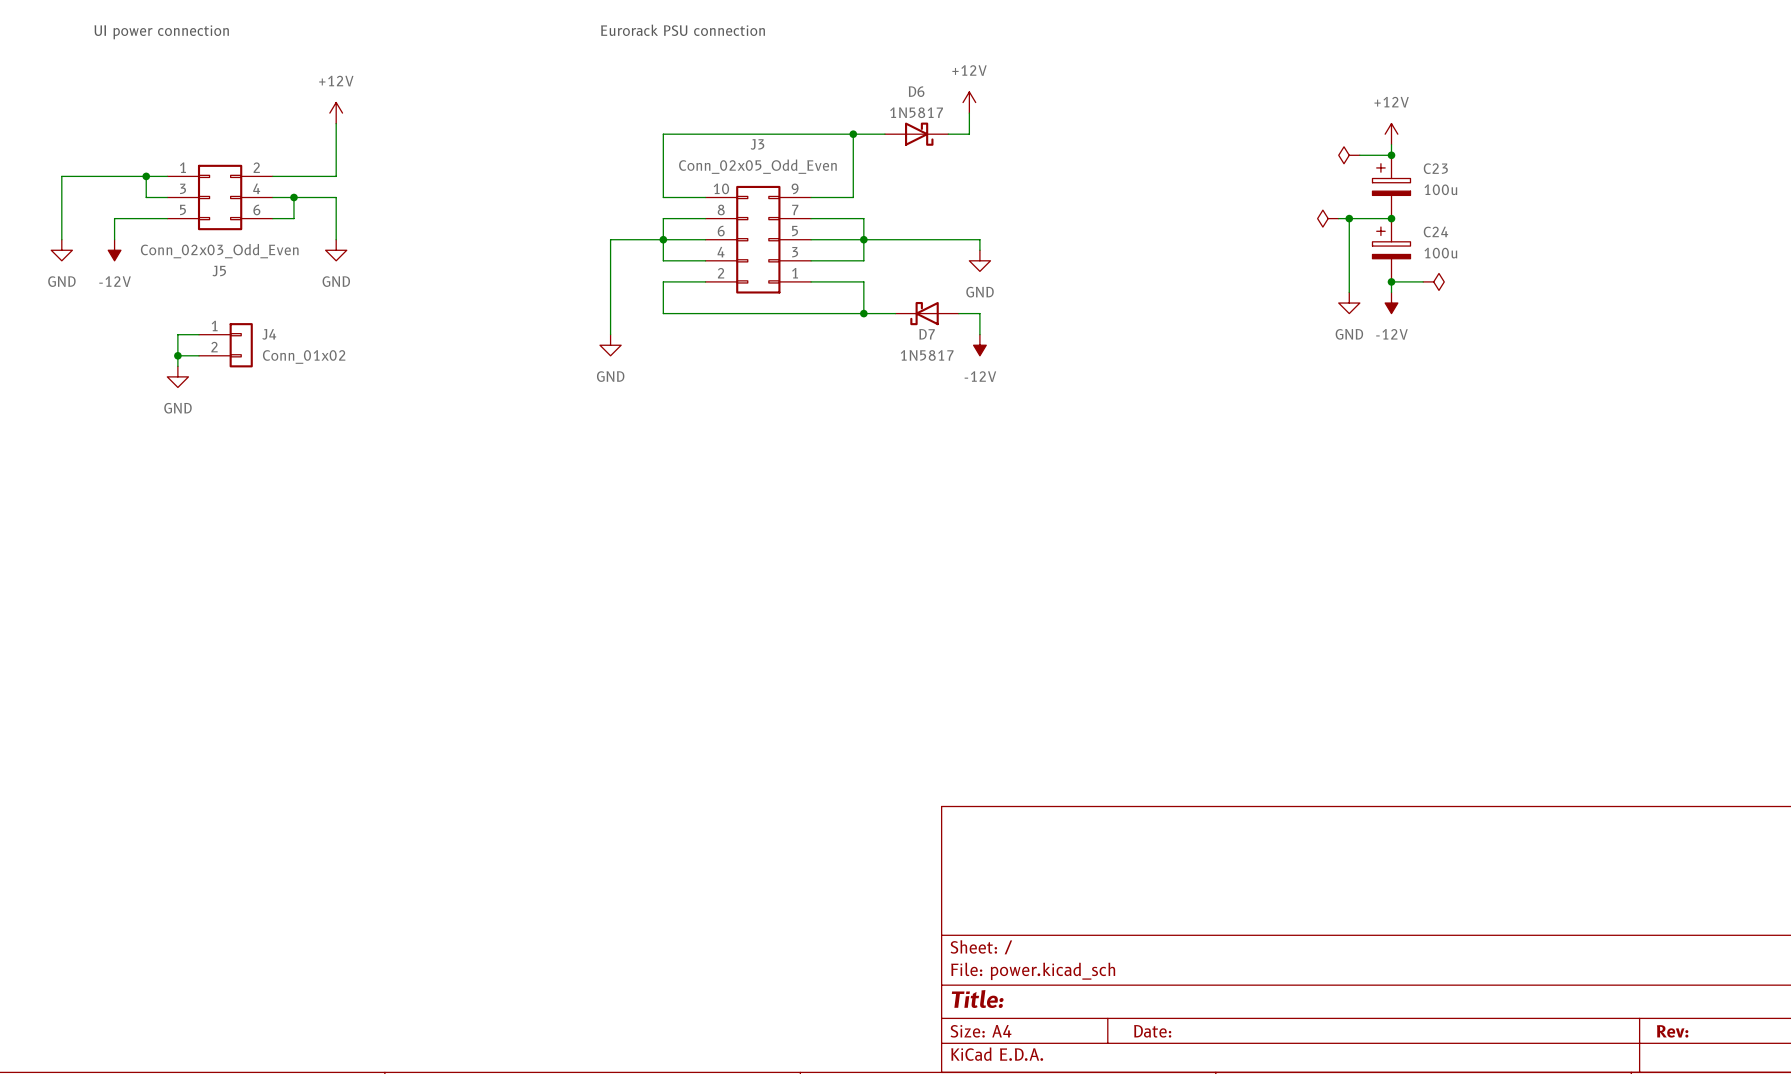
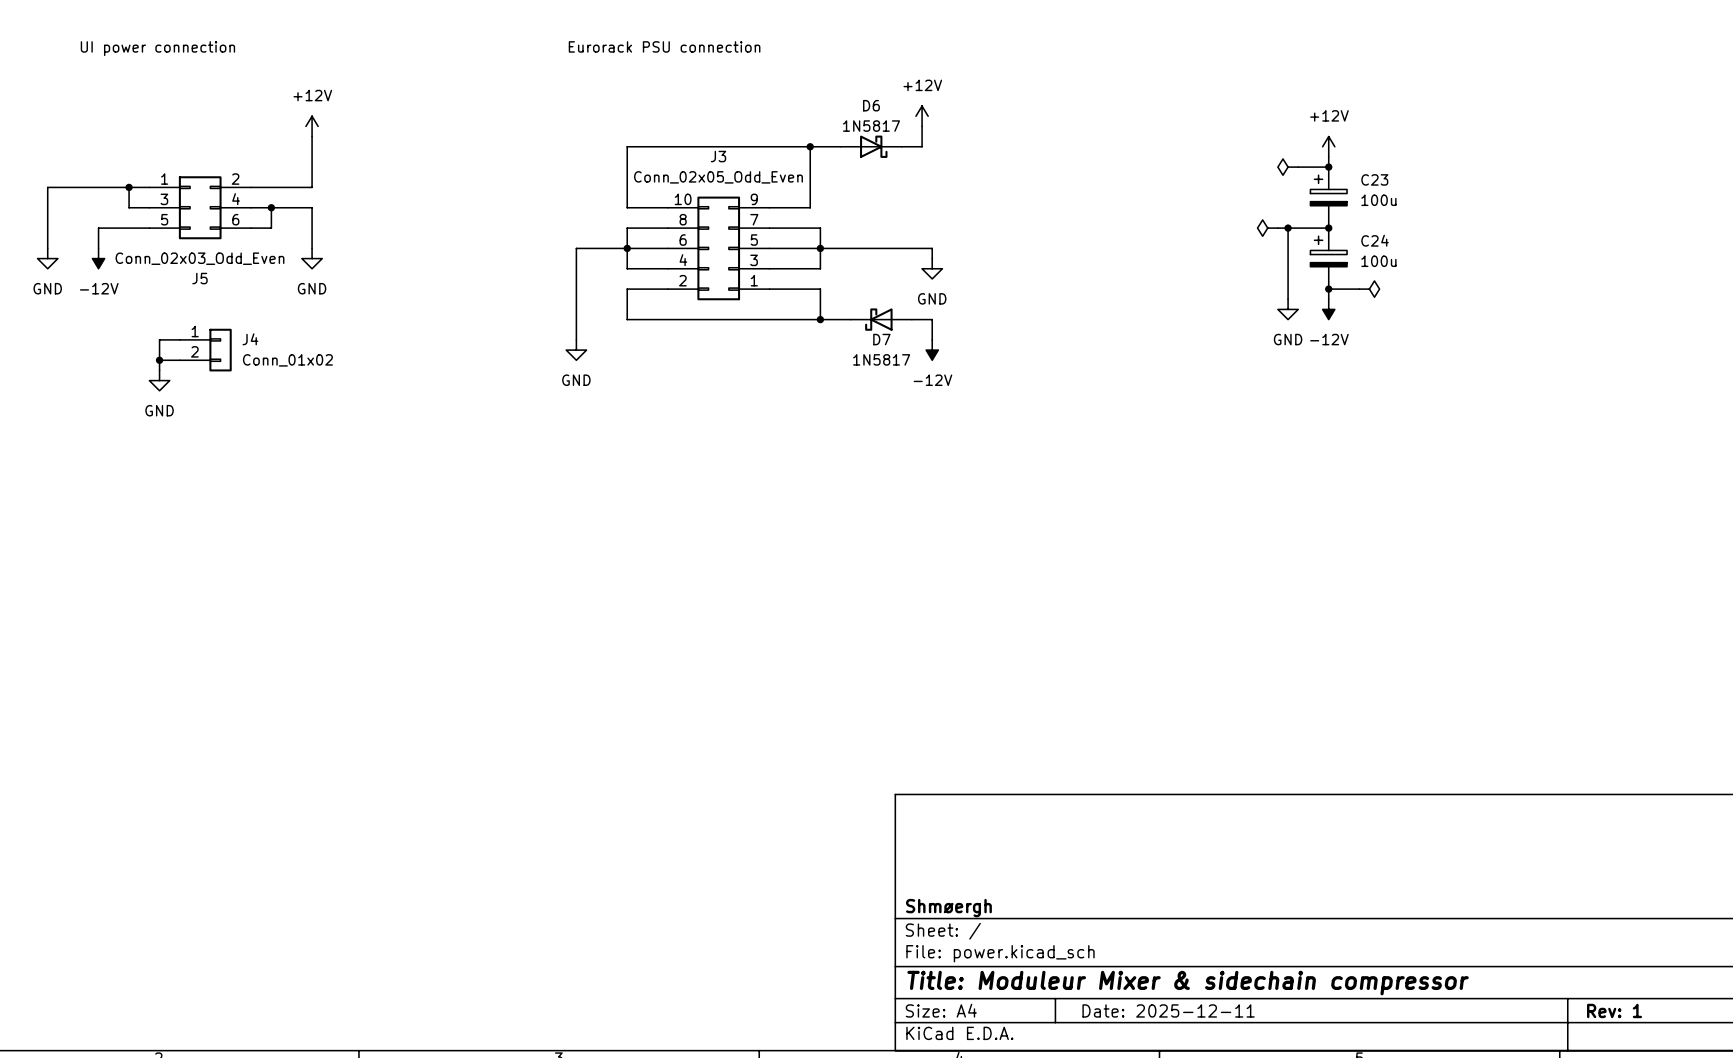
title block: none -> Shmøergh (948, 908)
title block: Title: (977, 999) -> Title: Moduleur Mixer & sidechain compressor (1188, 983)
title block: Date: (1152, 1031) -> Date: 2025-12-11 (1168, 1010)
title block: Rev: (1672, 1031) -> Rev: 1 (1614, 1010)

